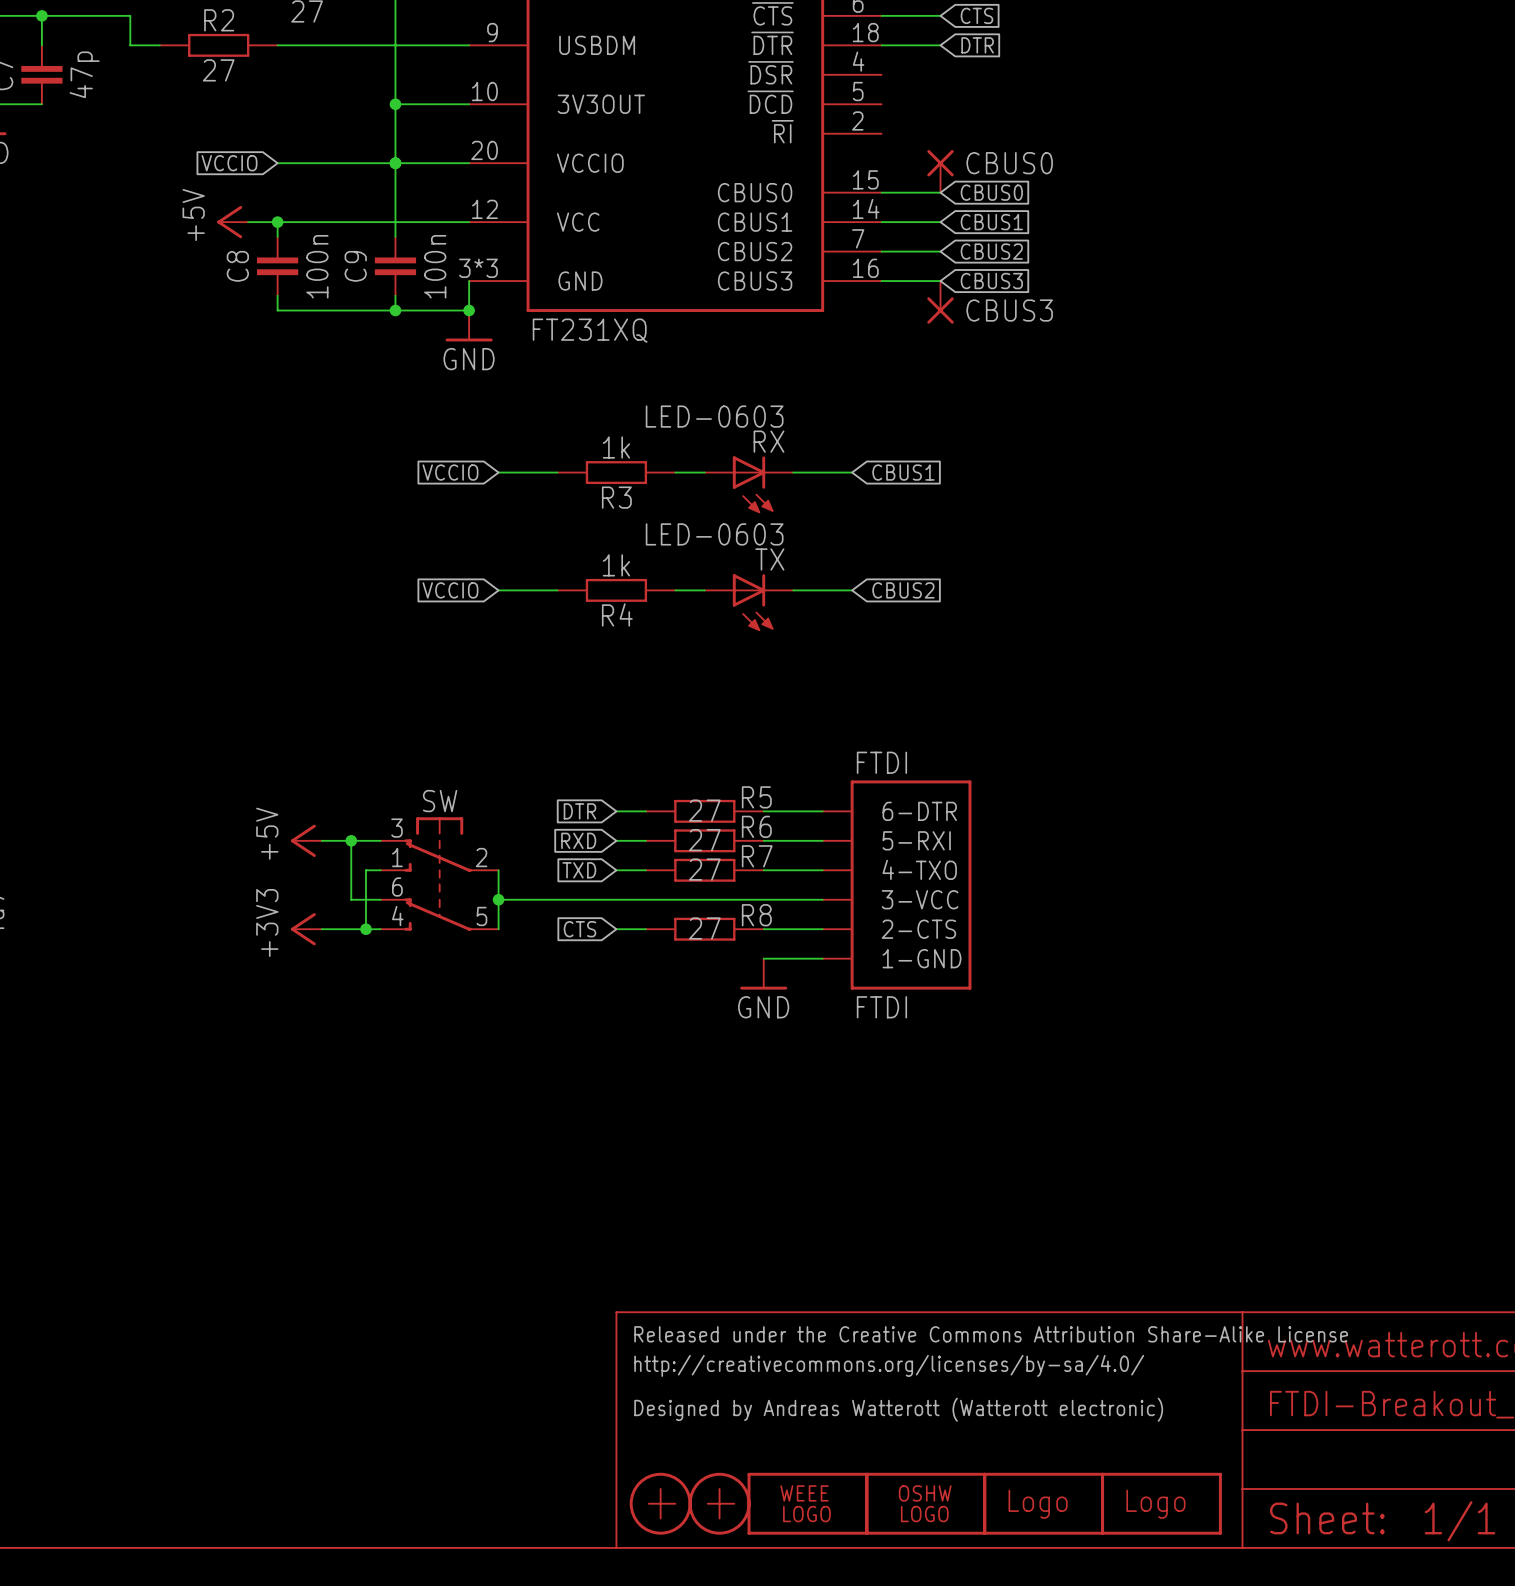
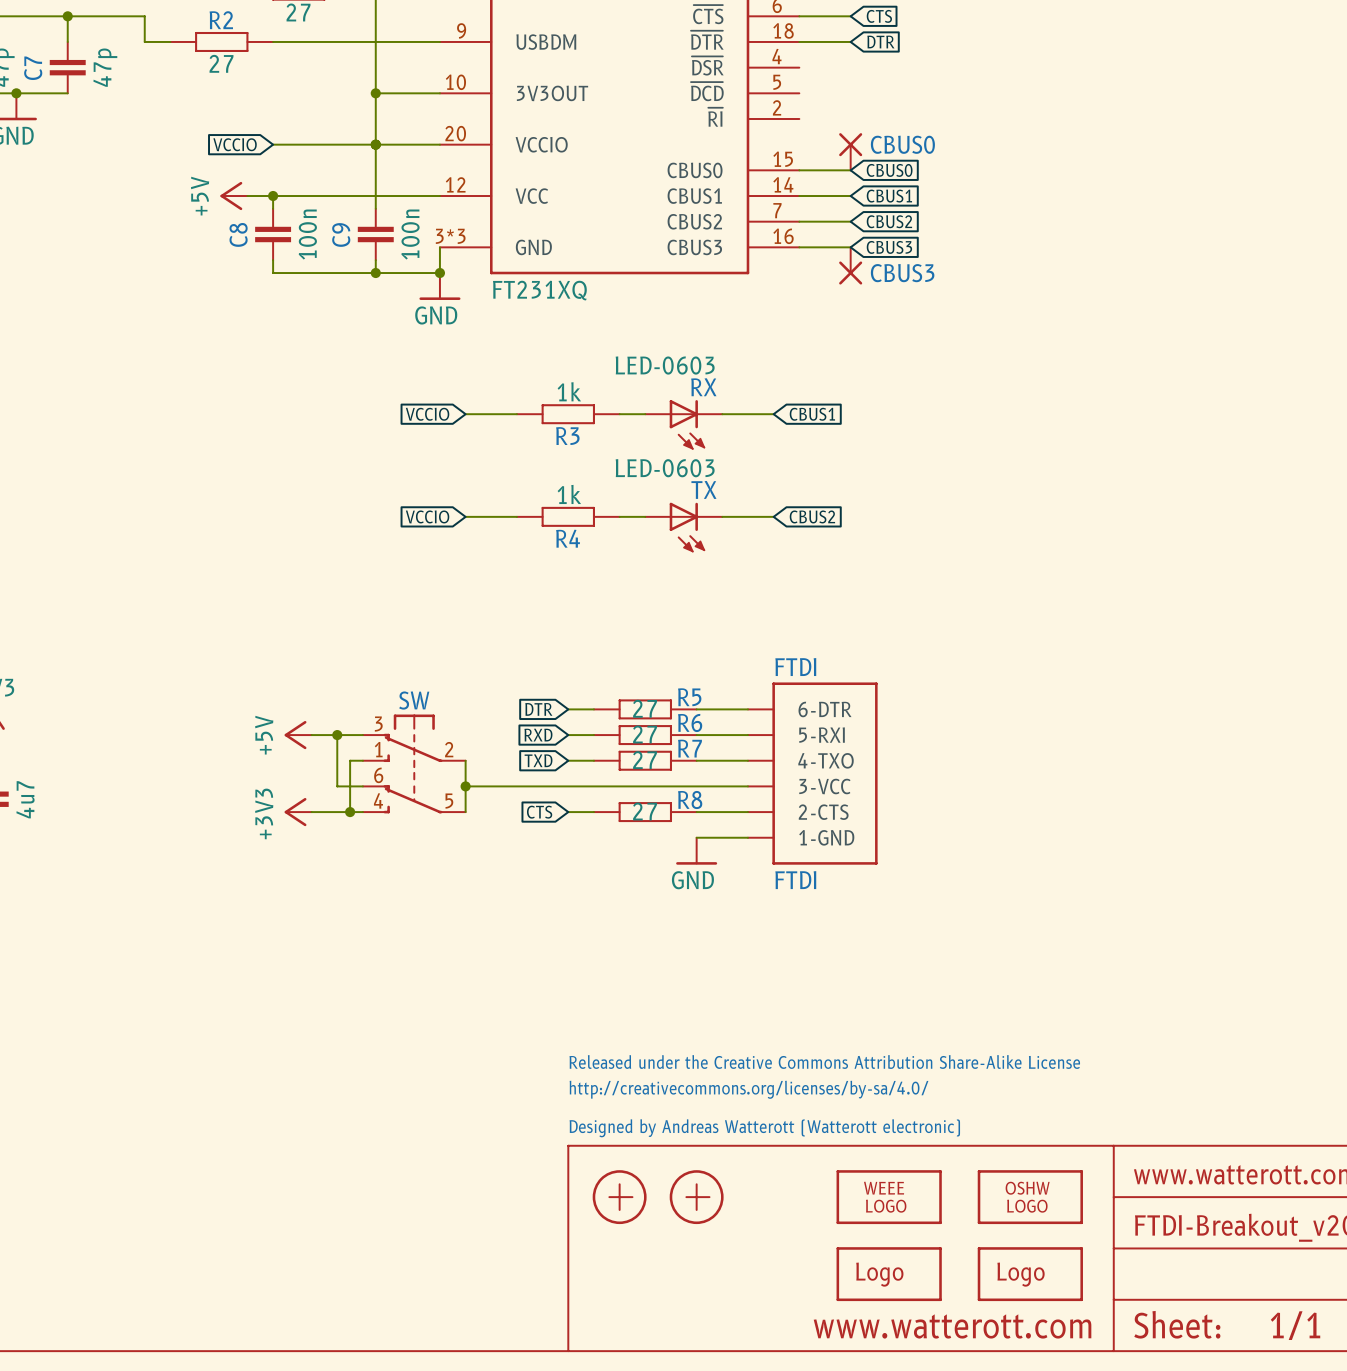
text position: Released under the Creative Commons Attribution Share-Alike License (991, 1334) -> Released under the Creative Commons Attribution Share-Alike License (824, 1062)
text position: http://creativecommons.org/licenses/by-sa/4.0/ (889, 1365) -> http://creativecommons.org/licenses/by-sa/4.0/ (749, 1089)
part: none -> (619, 1197)
part: none -> (696, 1197)
text position: Designed by Andreas Watterott (Watterott electronic) (898, 1409) -> Designed by Andreas Watterott (Watterott electronic) (764, 1128)
part: none -> (889, 1274)
part: (660, 1503) -> none
part: (719, 1503) -> none
part position: (807, 1503) -> (889, 1197)
part position: (925, 1503) -> (1030, 1197)
part: (1043, 1503) -> none
part position: (1161, 1503) -> (1030, 1274)
text: none -> www.watterott.com (952, 1326)

